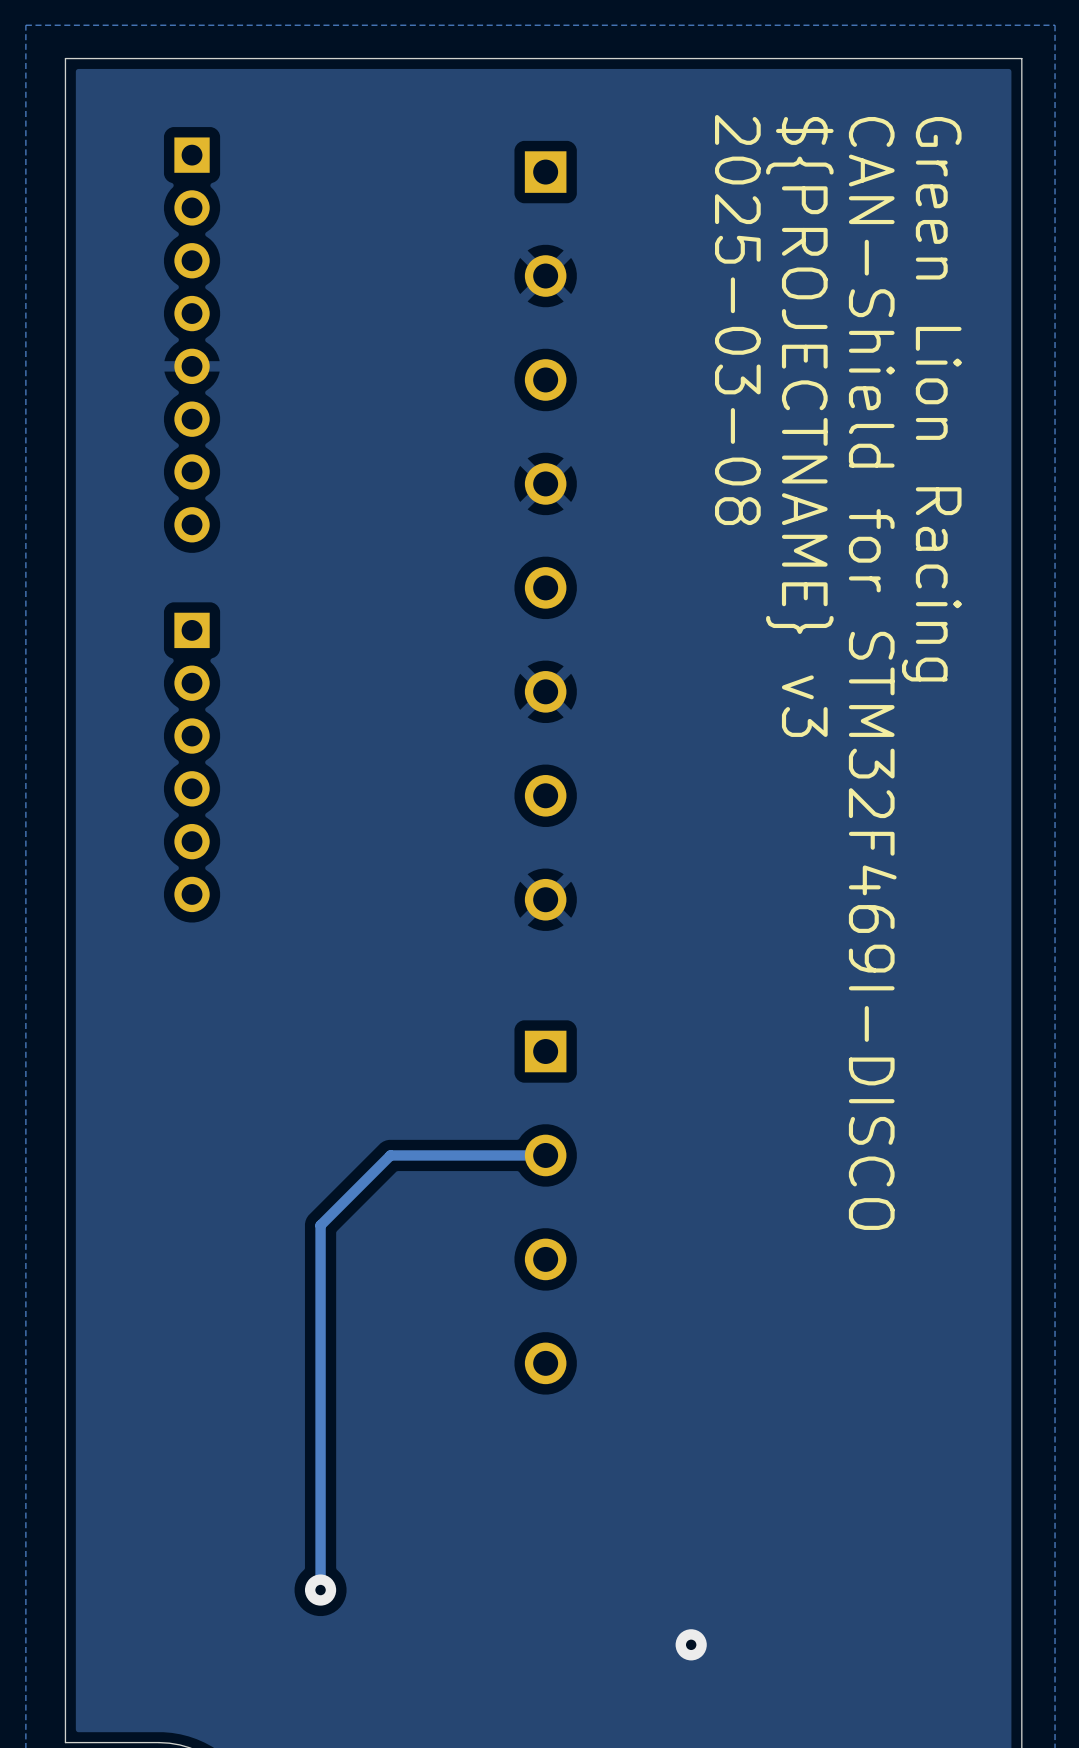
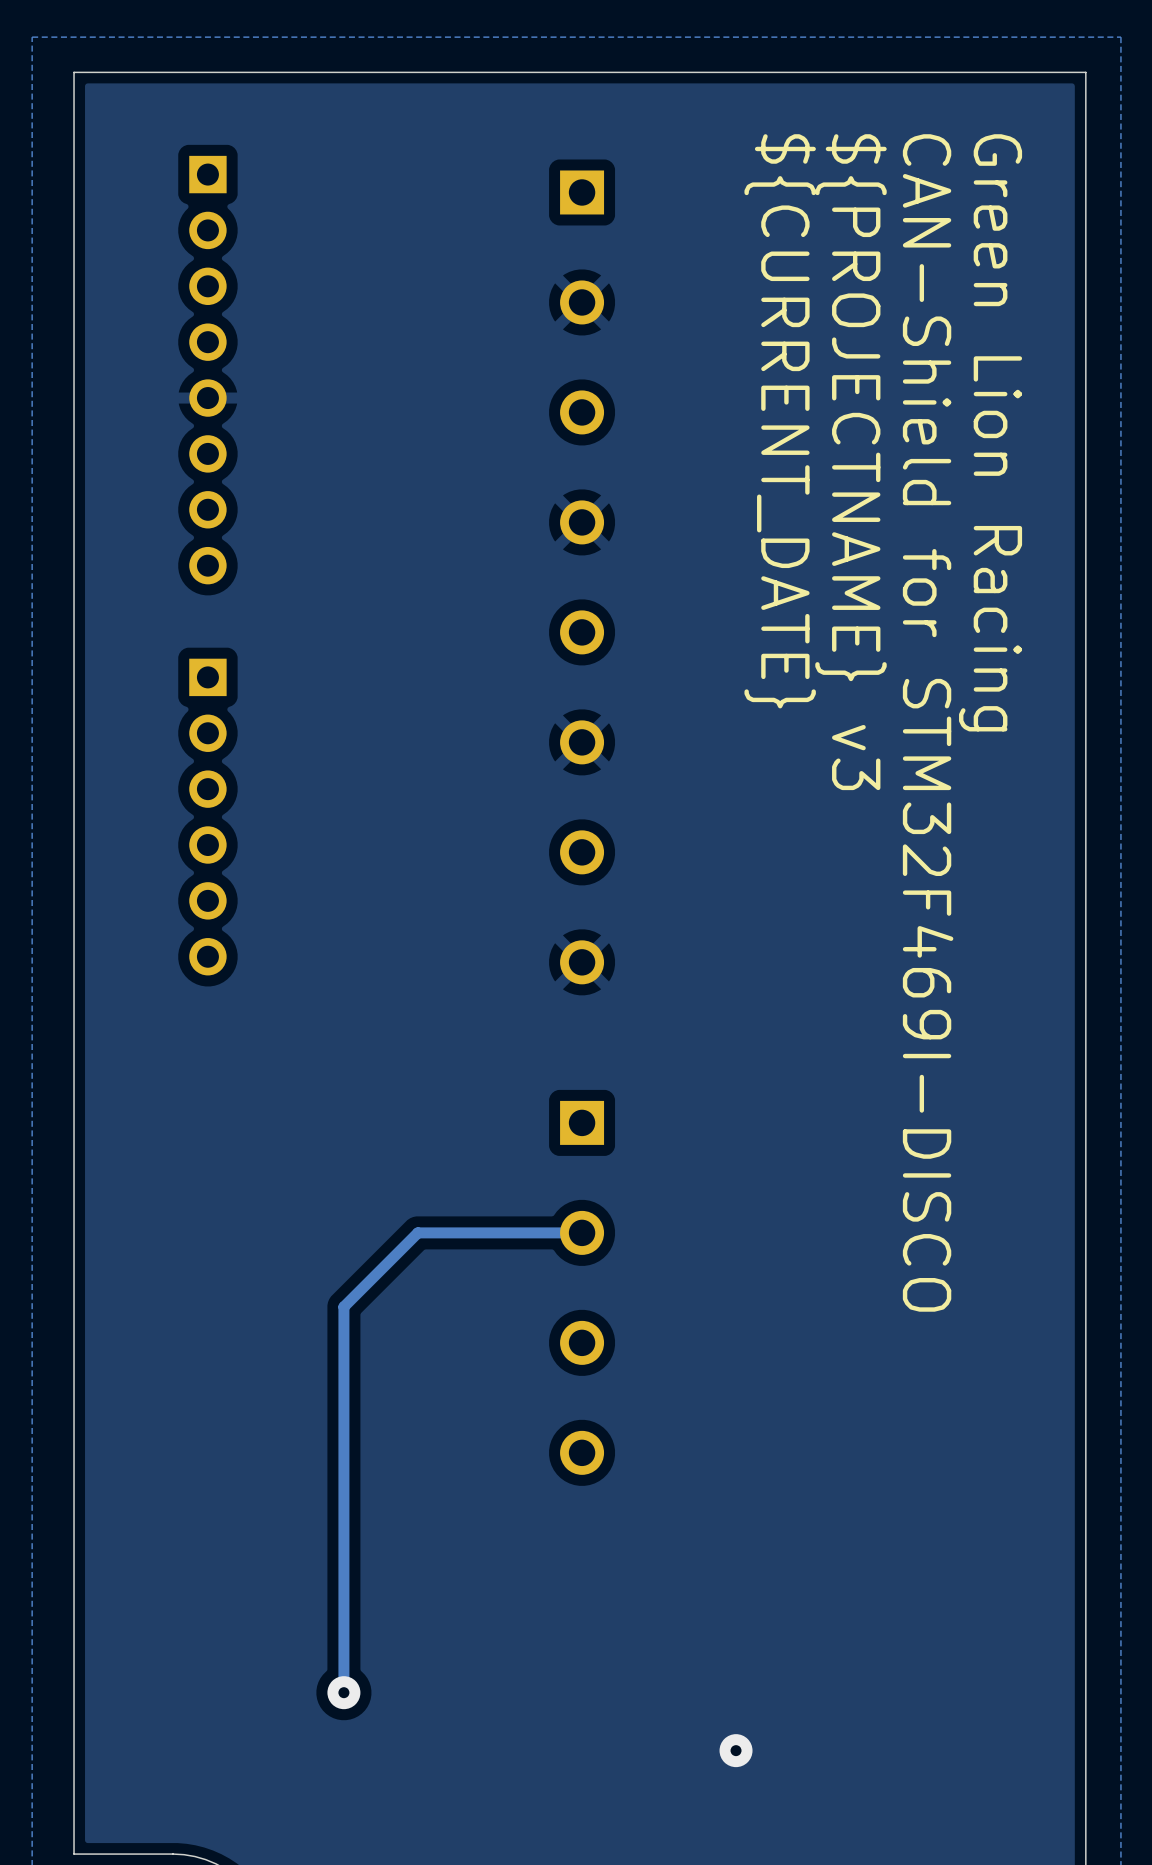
text: 2025-03-08 (737, 320) -> ${CURRENT_DATE} (780, 421)

